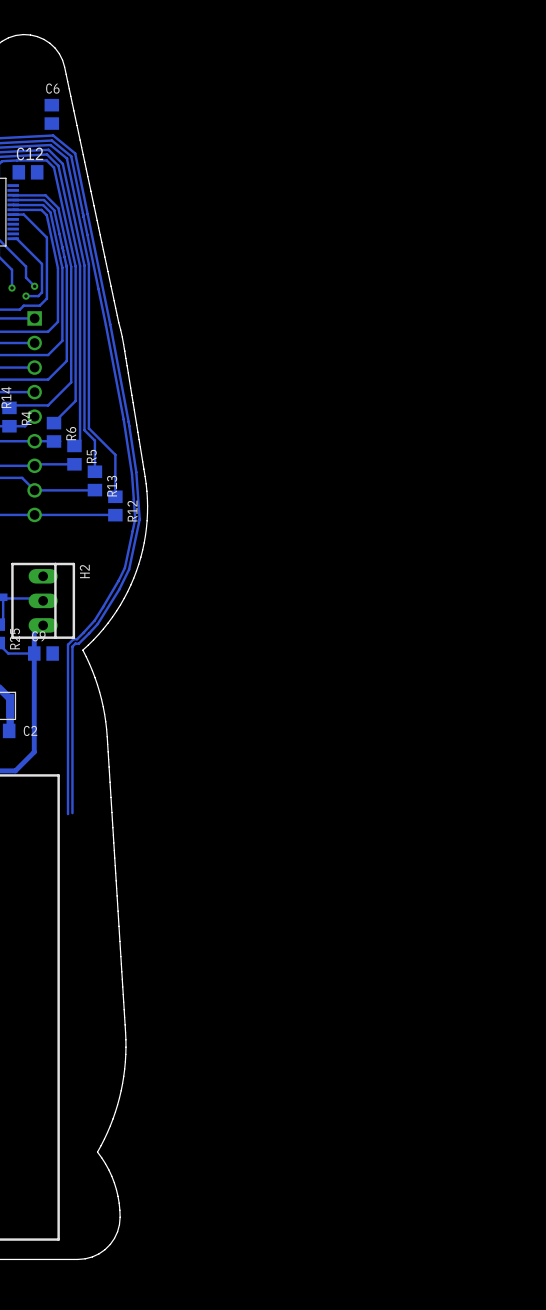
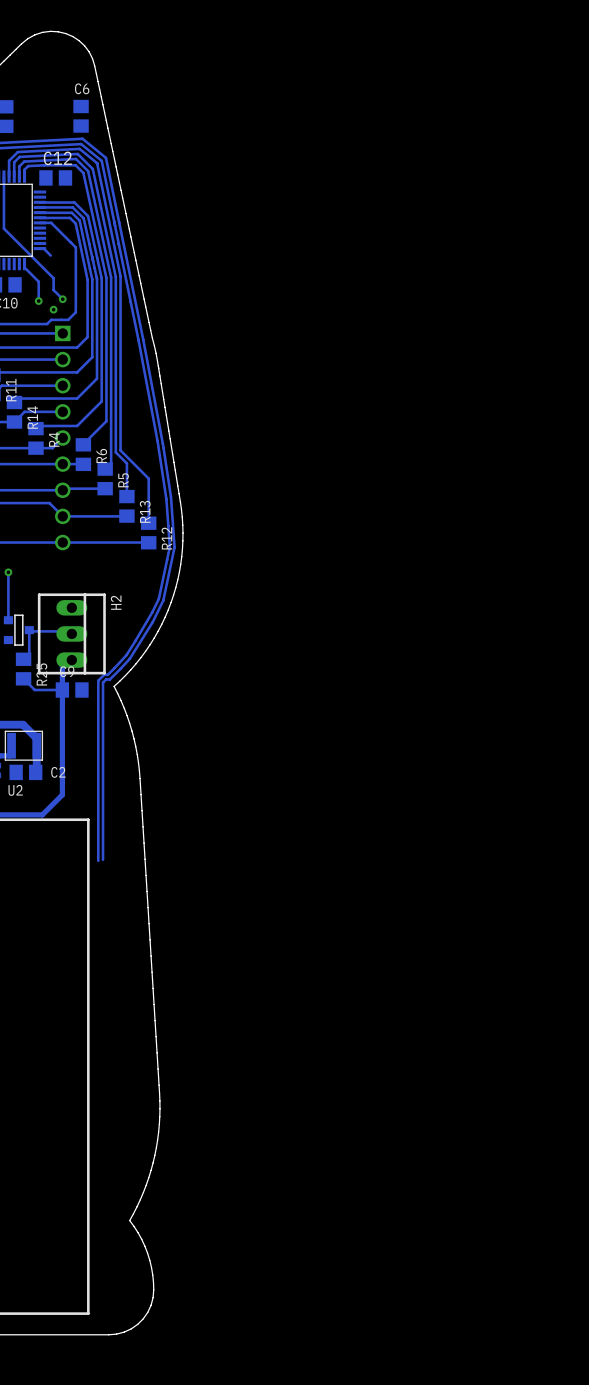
track: (23, 245) (41, 263) (41, 292) (38, 296) (26, 296) -> none

